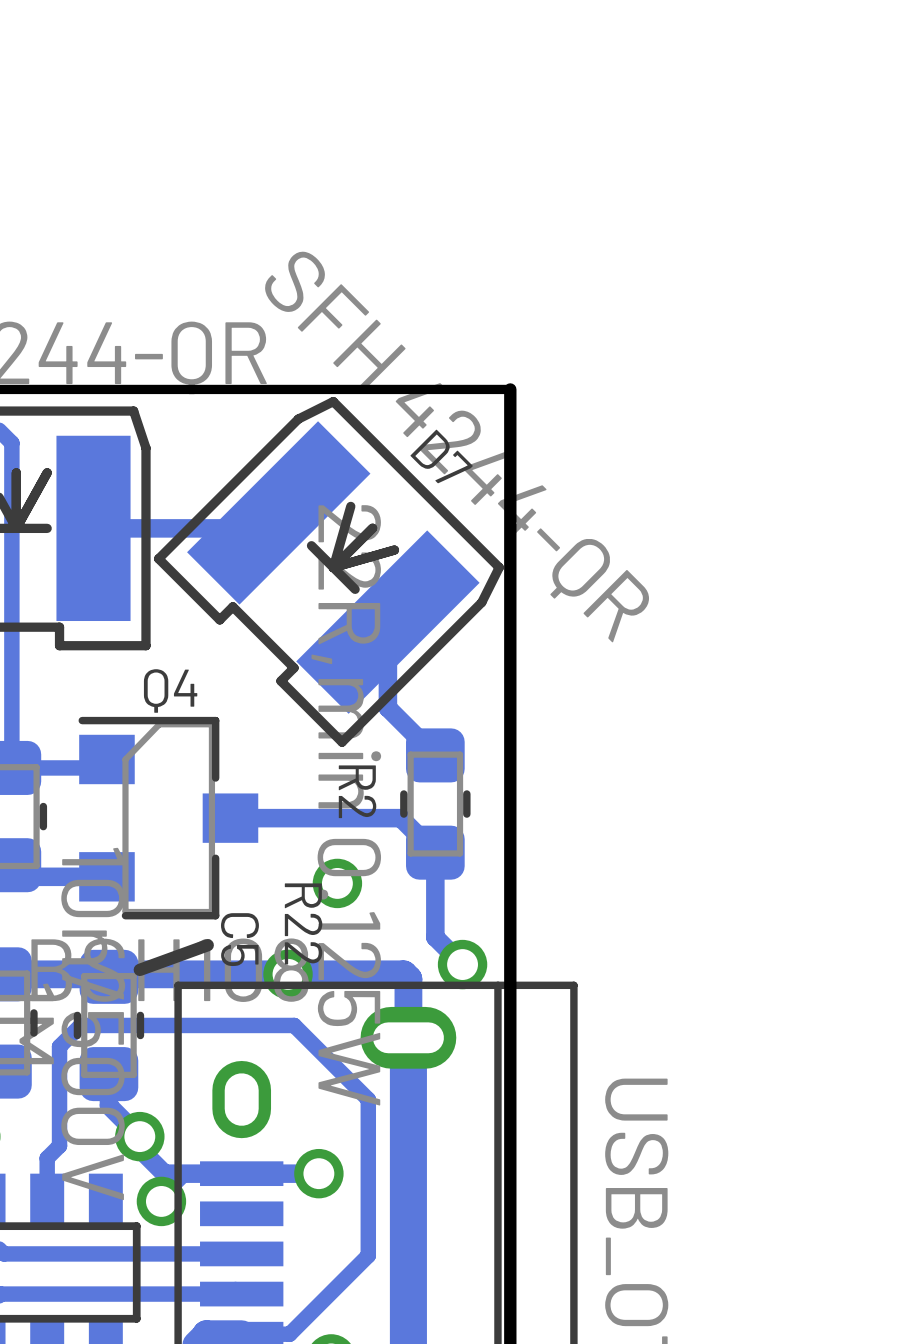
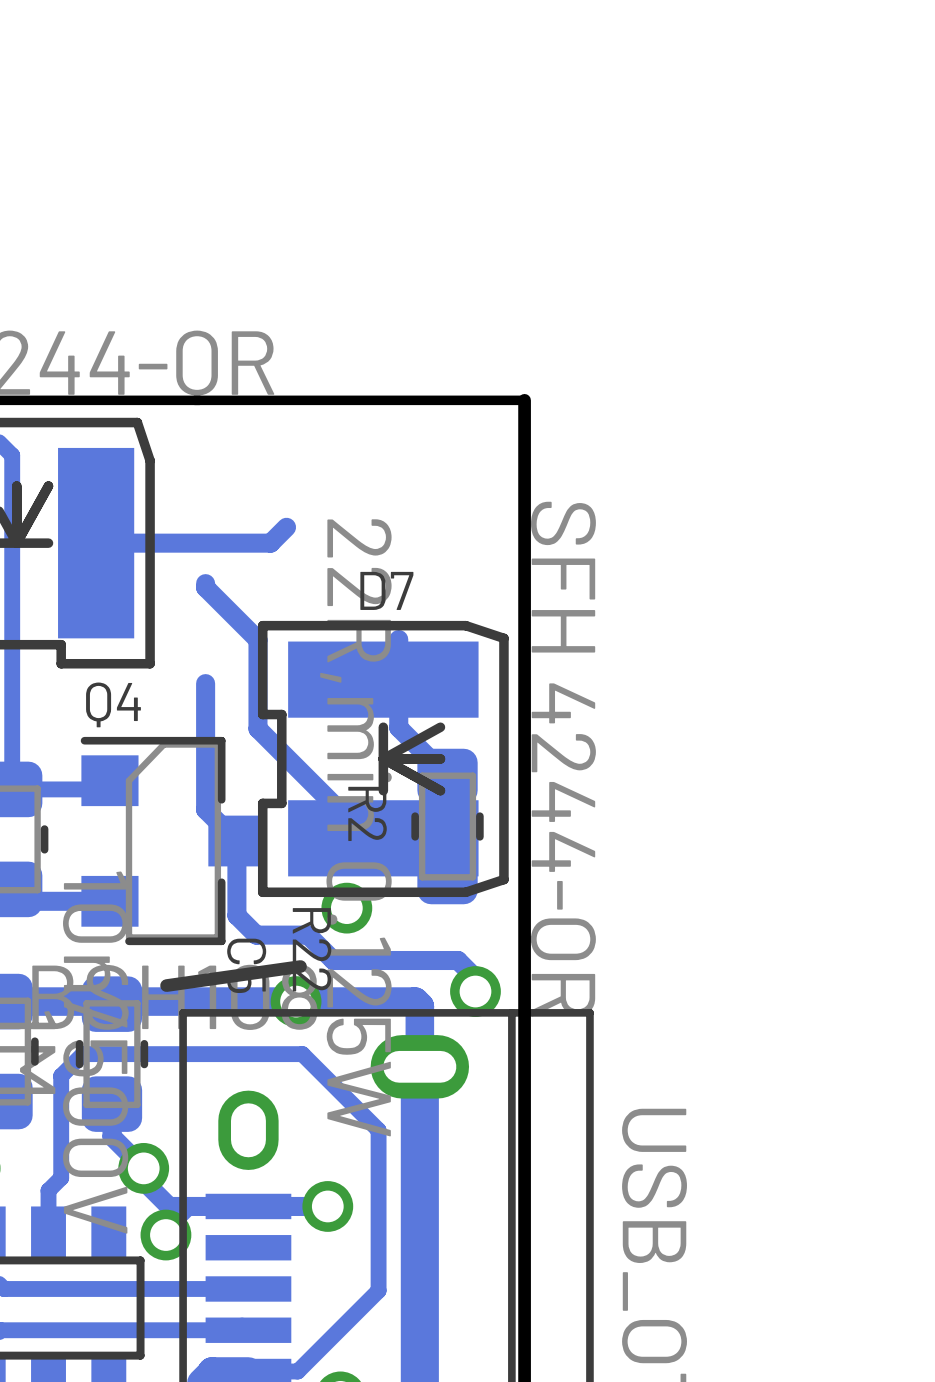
track: none -> (205, 583) (205, 587) (257, 639) (257, 728) (367, 838) (383, 838)
D7 rotation: 0° (328, 571) -> 45° clockwise (383, 758)
Q4 name position: Q4 (170, 690) -> Q4 (113, 704)
track: (230, 818) (400, 818) (435, 852) (435, 937) (462, 964) -> (205, 683) (205, 809) (236, 841) (236, 915) (256, 935) (308, 935) (333, 960) (457, 960) (475, 978) (475, 991)
line: none -> (300, 966) (166, 985)
line: (207, 945) (139, 969) -> none

